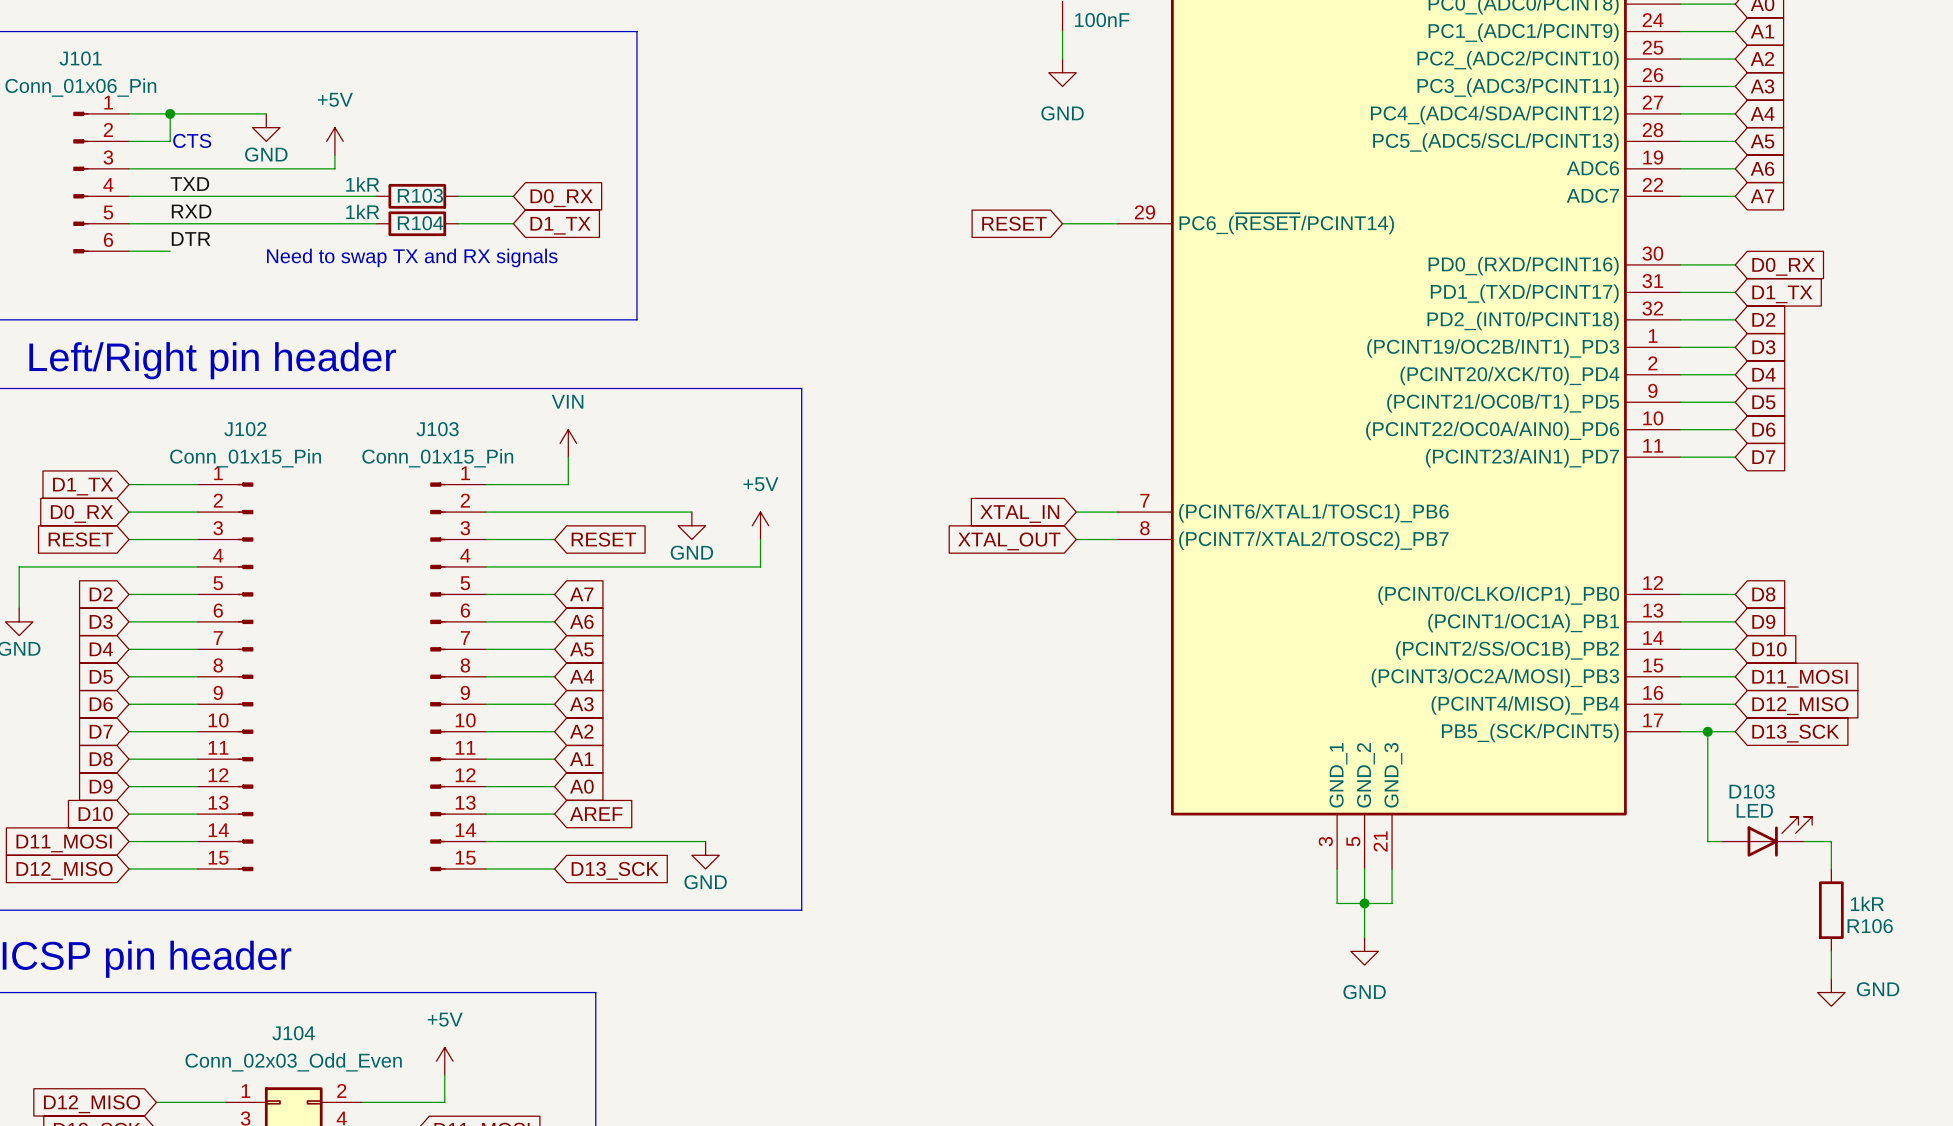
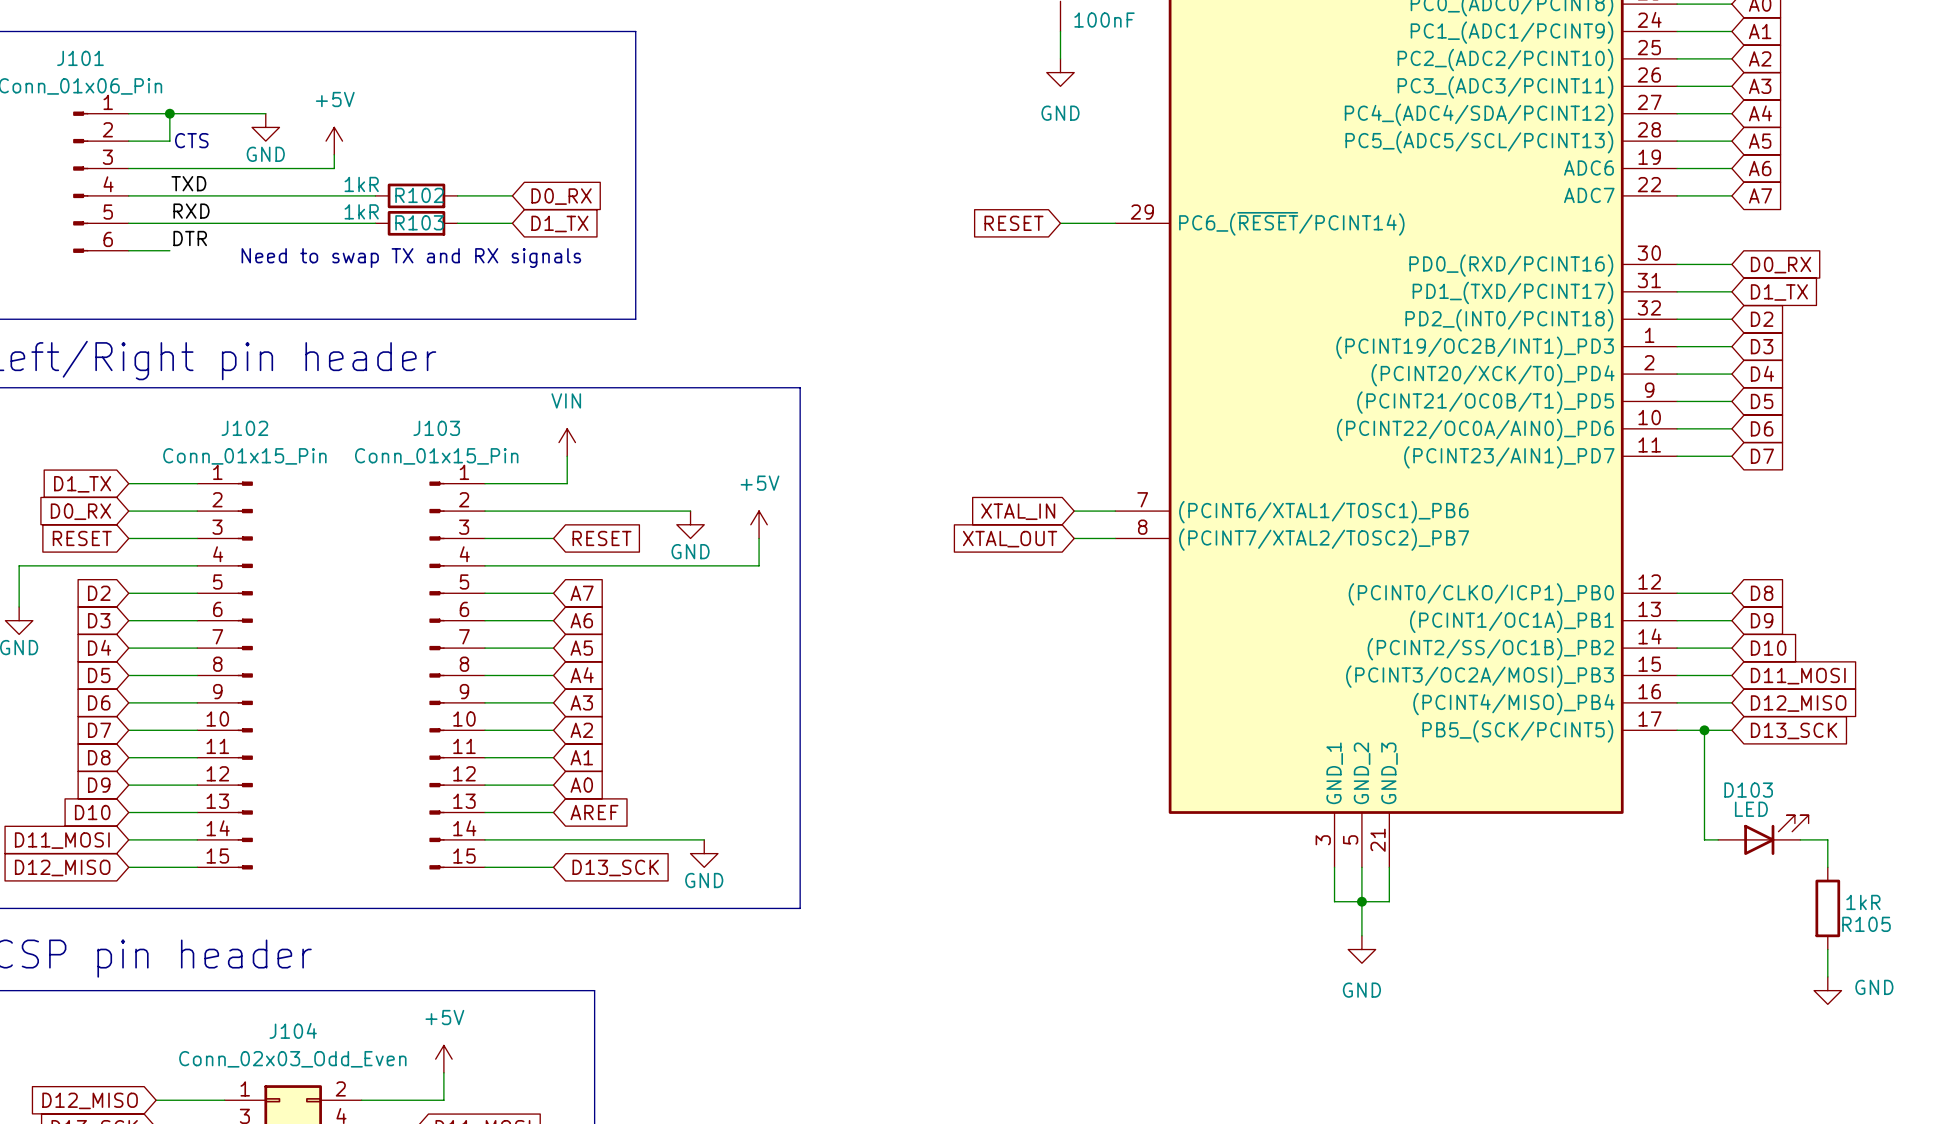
R103 name: R103 (420, 195) -> R102 (419, 195)
R104 name: R104 (420, 223) -> R103 (419, 222)
R106 name: R106 (1870, 926) -> R105 (1866, 924)

